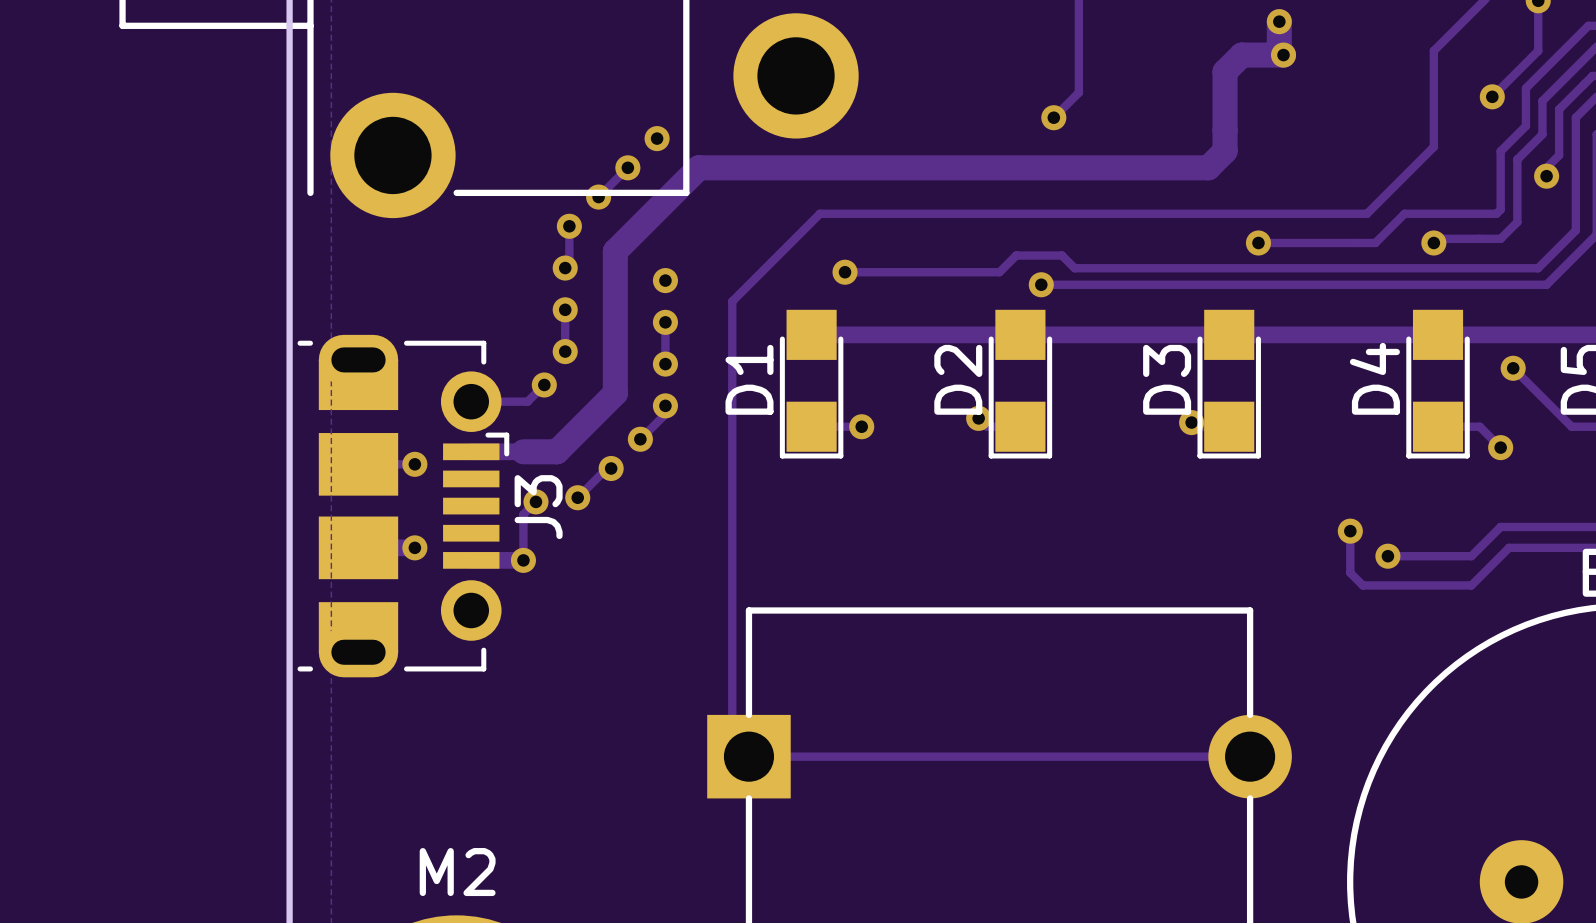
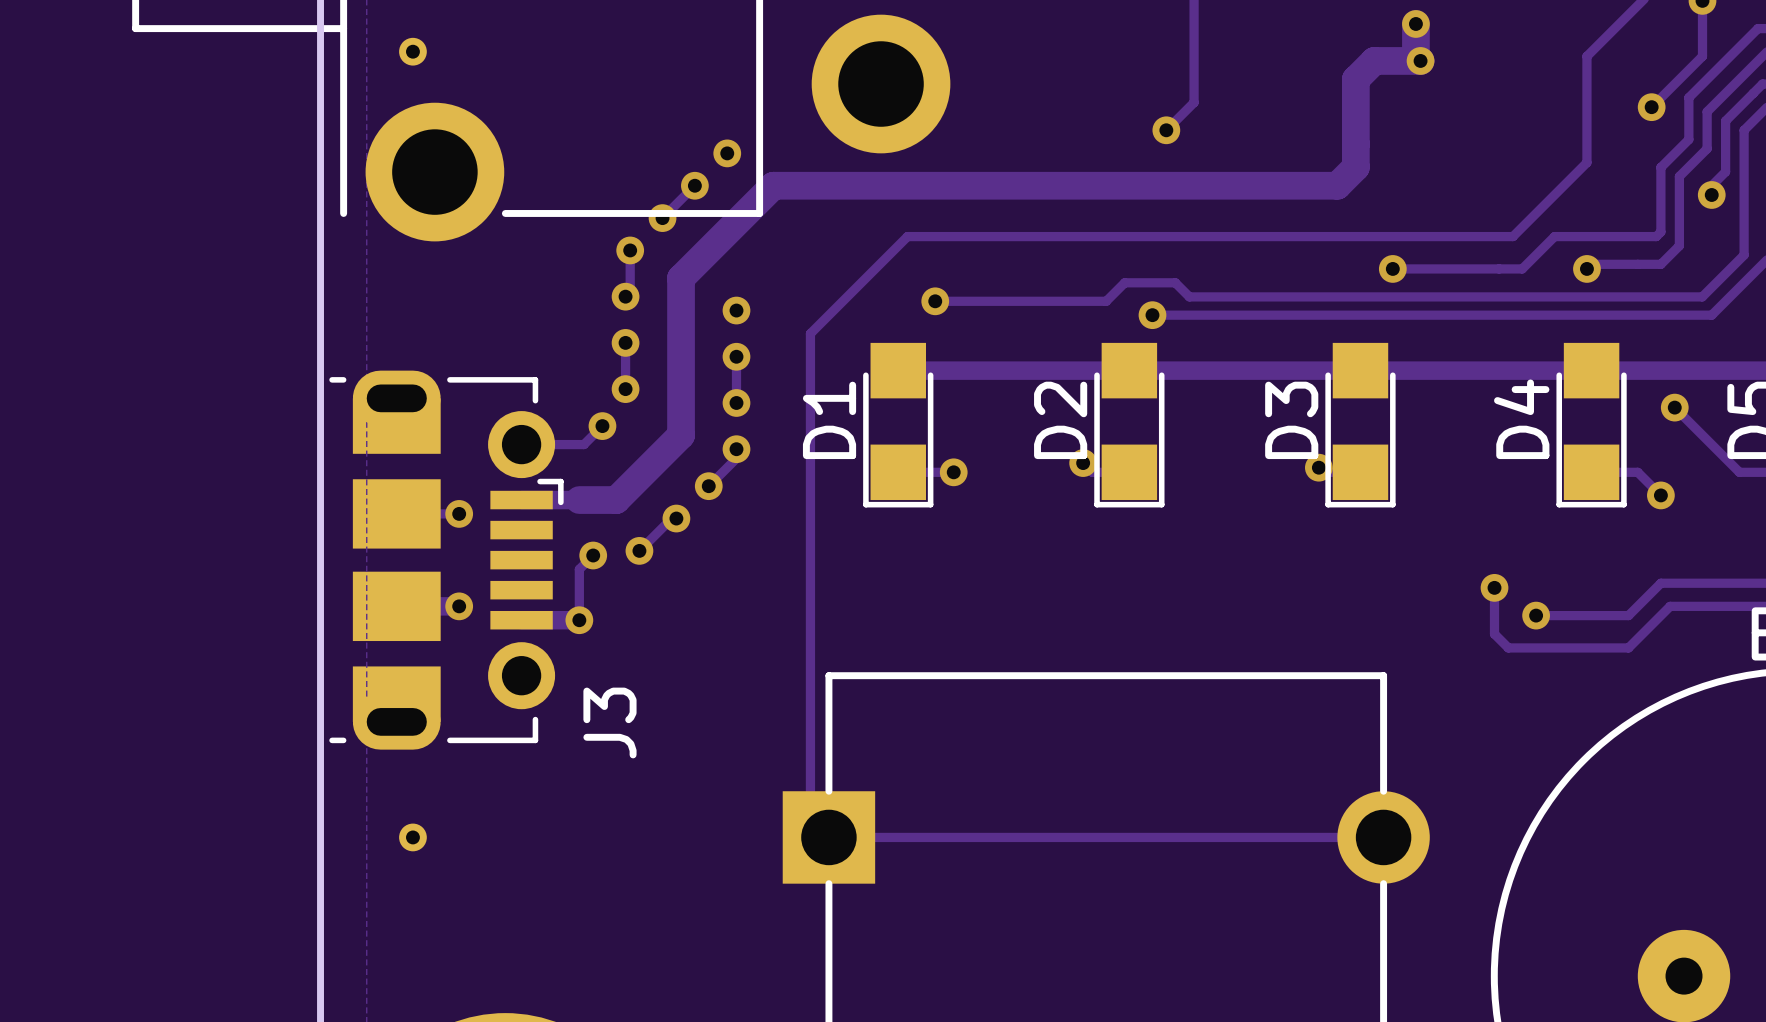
part: none -> (412, 51)
J3 name position: J3 (538, 507) -> J3 (609, 723)
part: none -> (412, 837)
M2 name: M2 (457, 872) -> none

